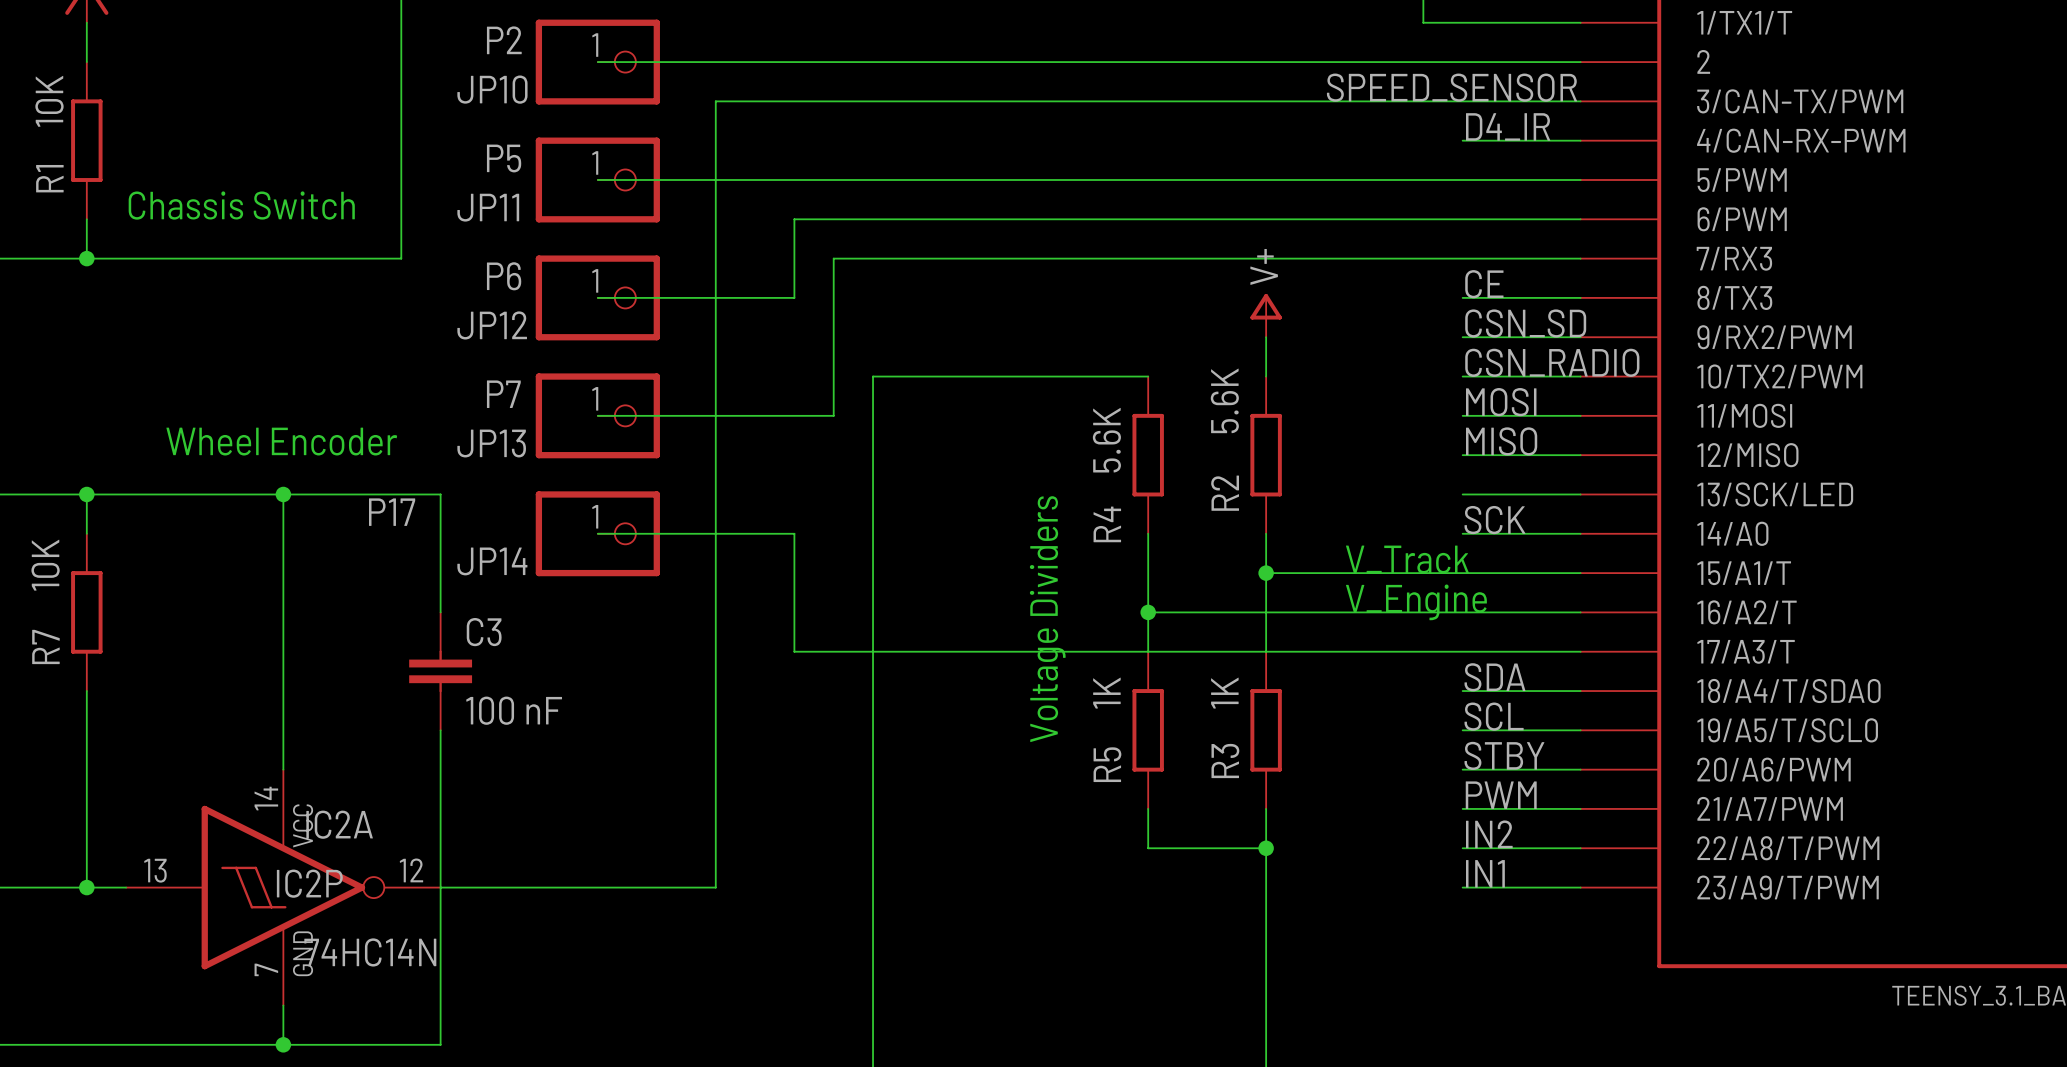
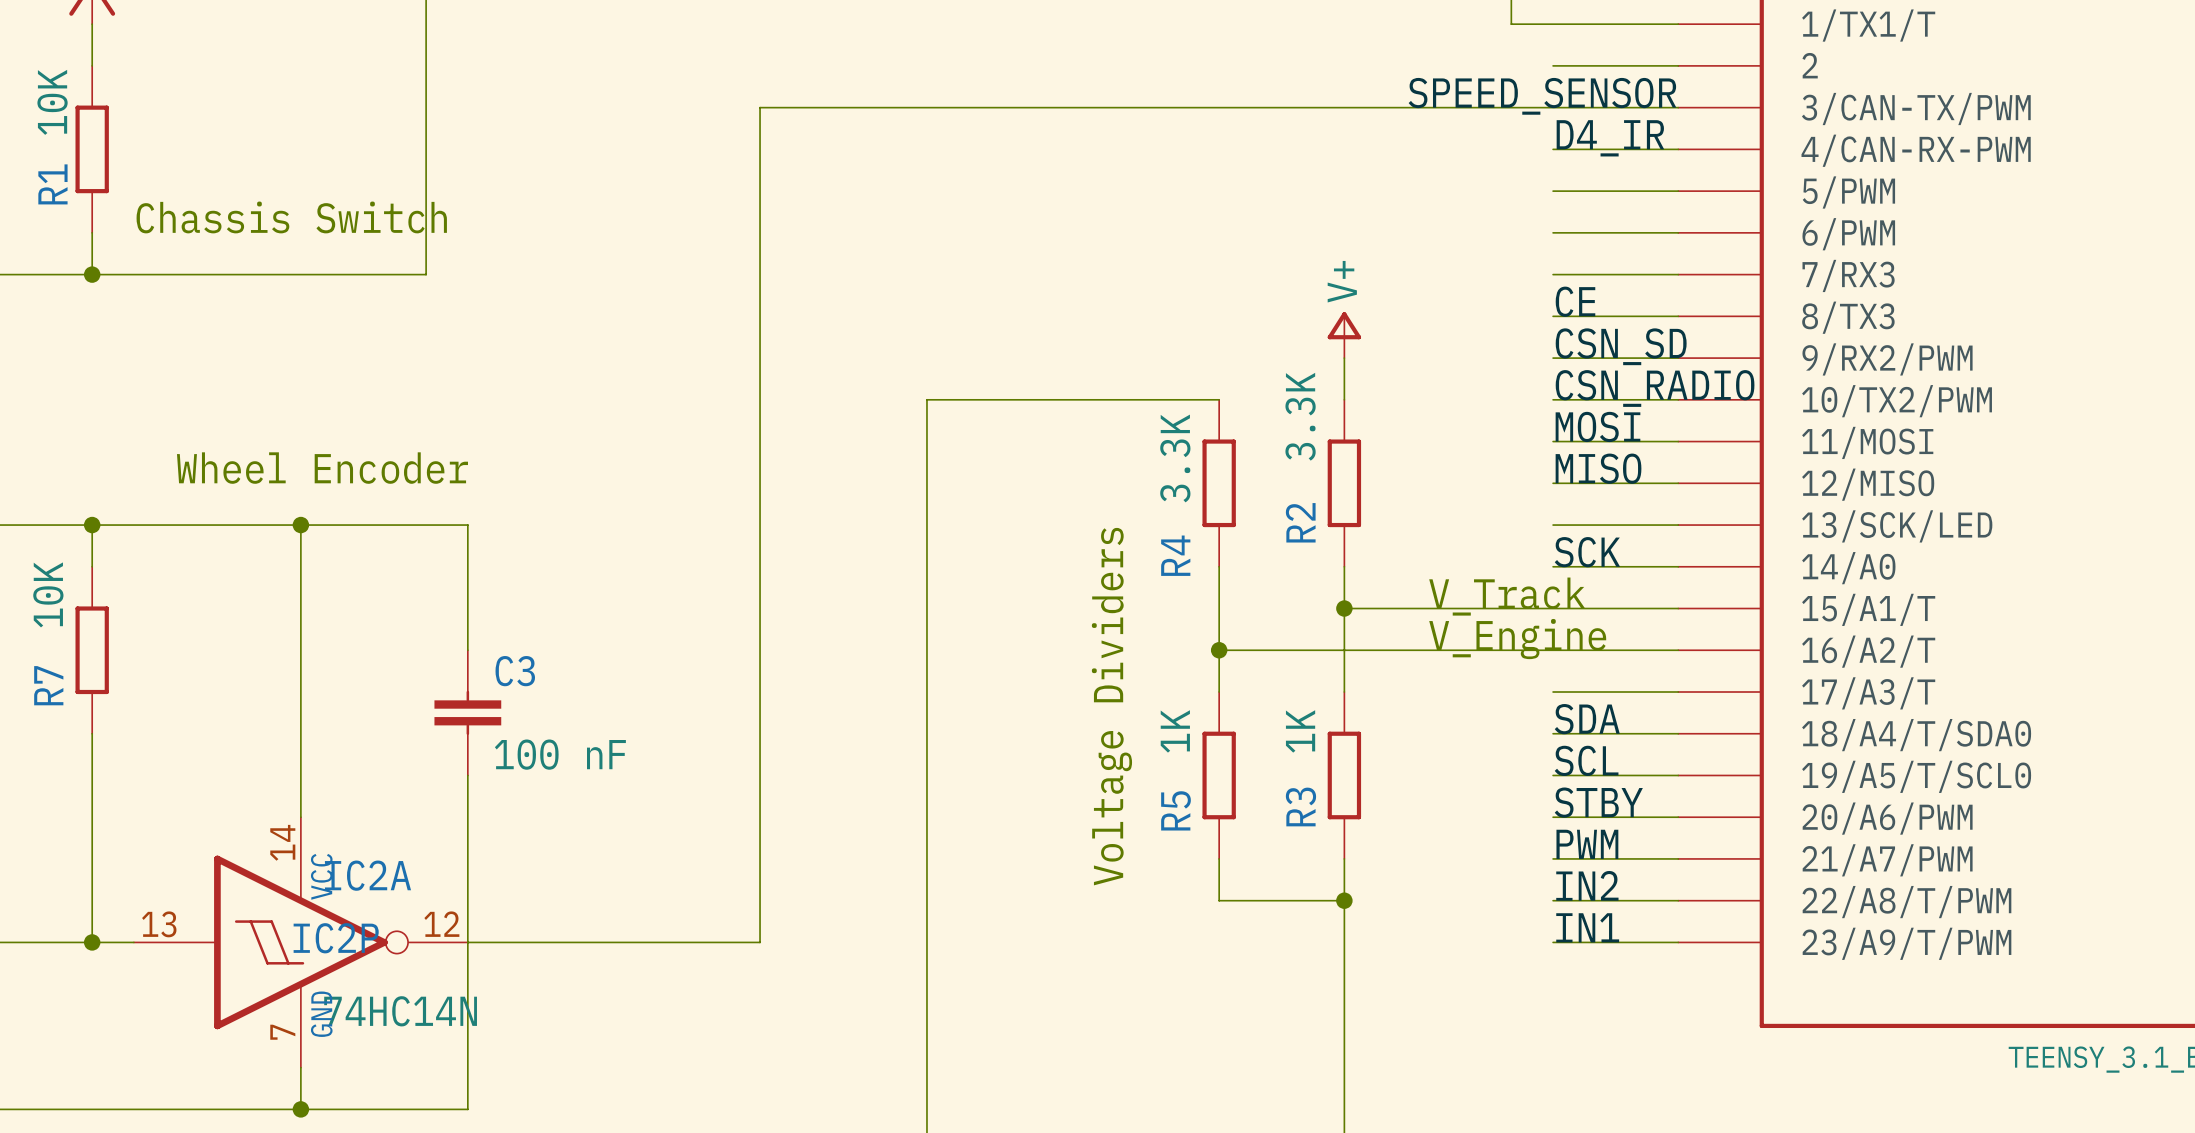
wire: (597, 62) (1462, 62) -> none
JP10: P2 (597, 62) -> none
wire: (597, 179) (1462, 179) -> none
JP11: P5 (597, 179) -> none
wire: (1462, 219) (794, 219) (794, 297) (597, 297) -> none
wire: (1462, 258) (833, 258) (833, 415) (597, 415) -> none
JP12: P6 (597, 297) -> none
R2 value: 5.6K (1224, 400) -> 3.3K (1300, 416)
JP13: P7 (597, 415) -> none
R4 value: 5.6K (1106, 440) -> 3.3K (1175, 458)
wire: (597, 533) (794, 533) (794, 651) (1462, 651) -> none
JP14: P17 (597, 533) -> none

